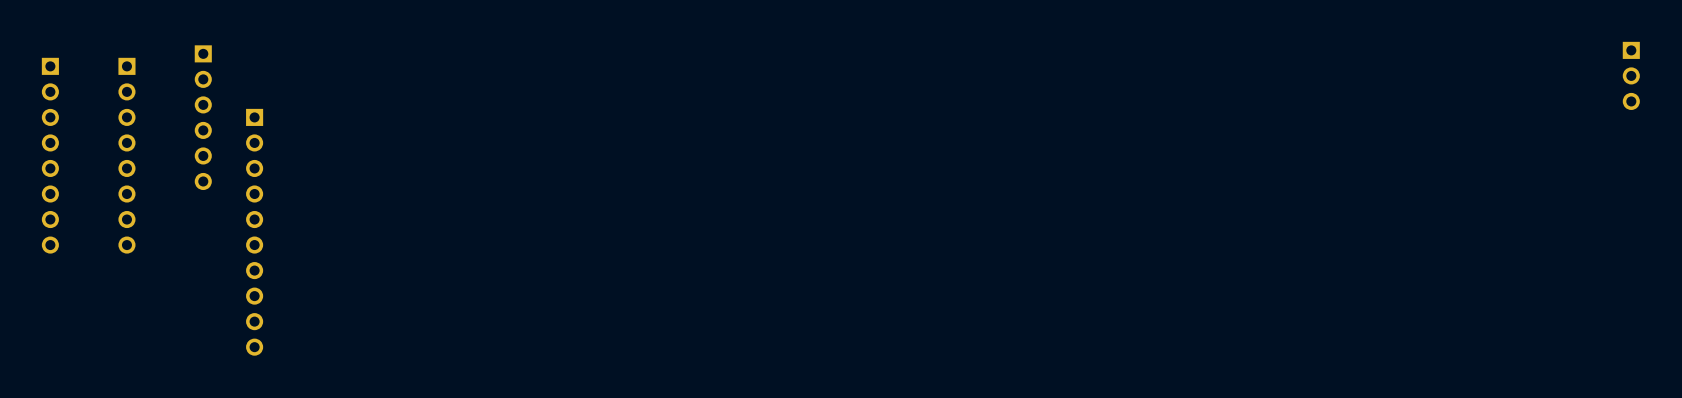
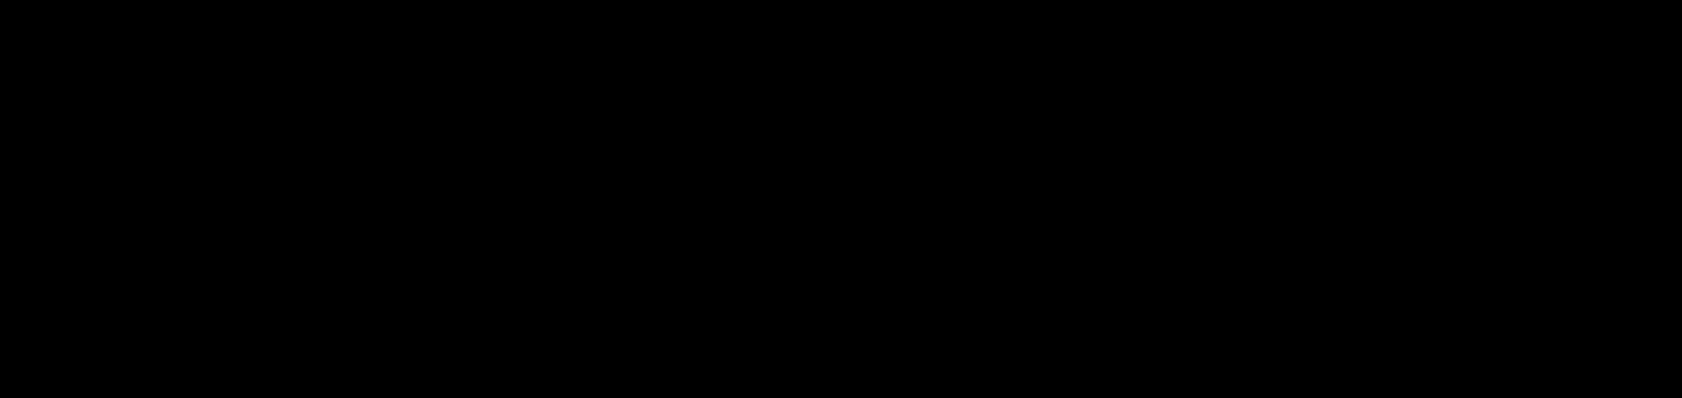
part: (1631, 75) -> none
part: (203, 117) -> none
part: (50, 155) -> none
part: (126, 155) -> none
part: (254, 232) -> none

